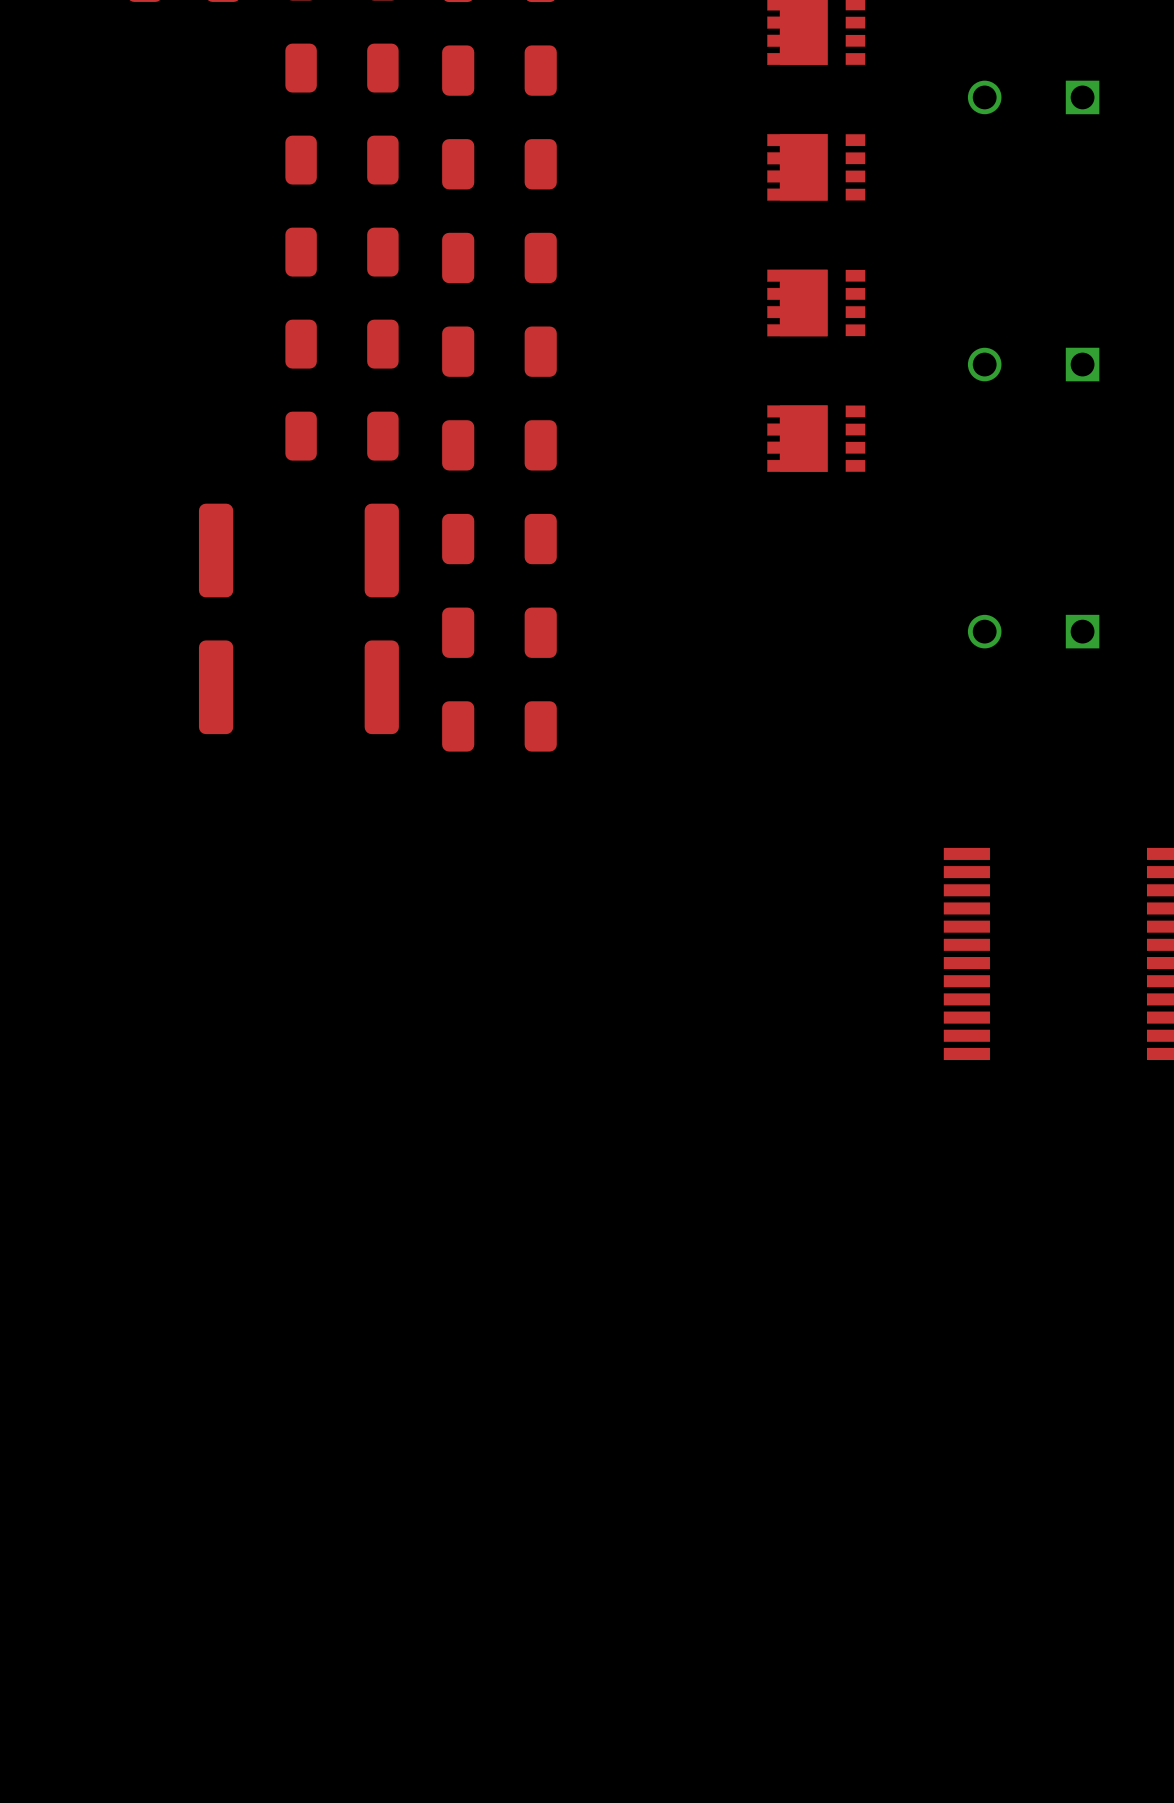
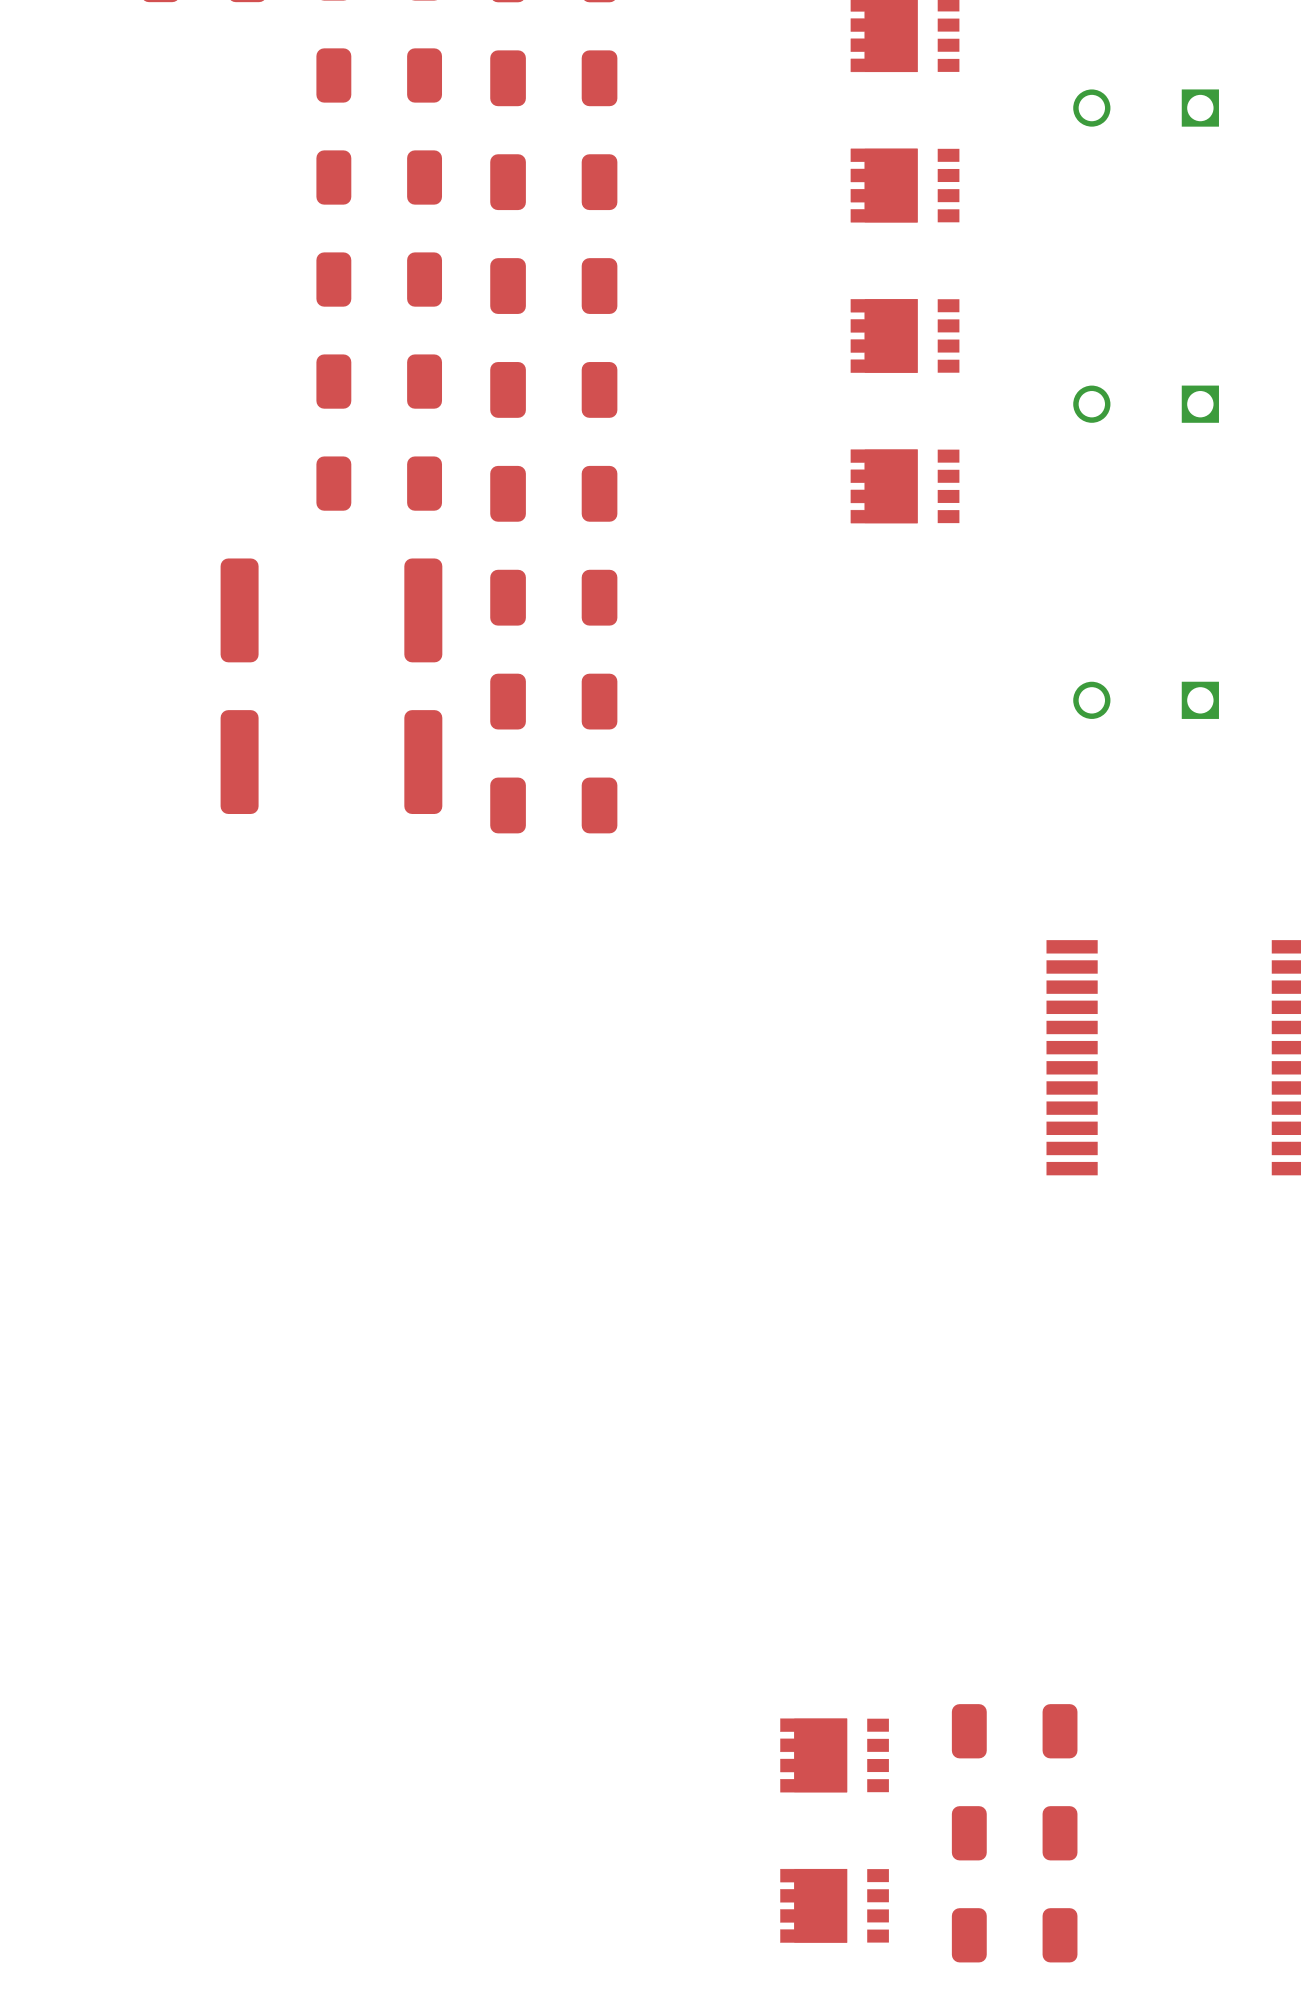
part: none -> (1014, 1731)
part: none -> (834, 1755)
part: none -> (1014, 1833)
part: none -> (834, 1905)
part: none -> (1014, 1935)

